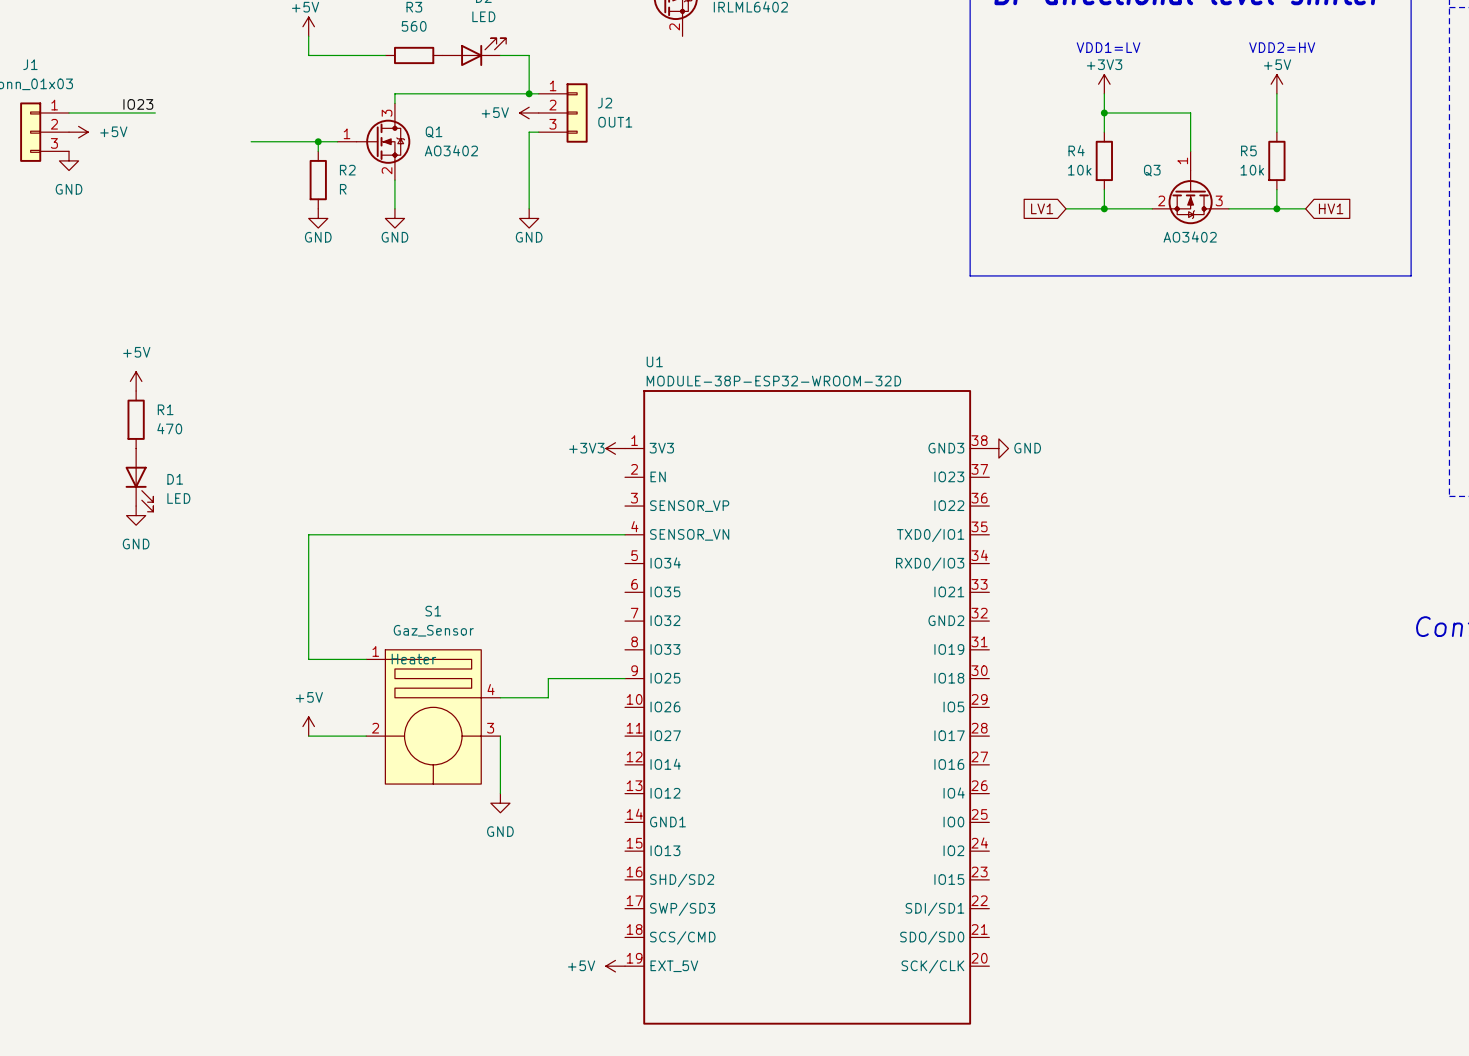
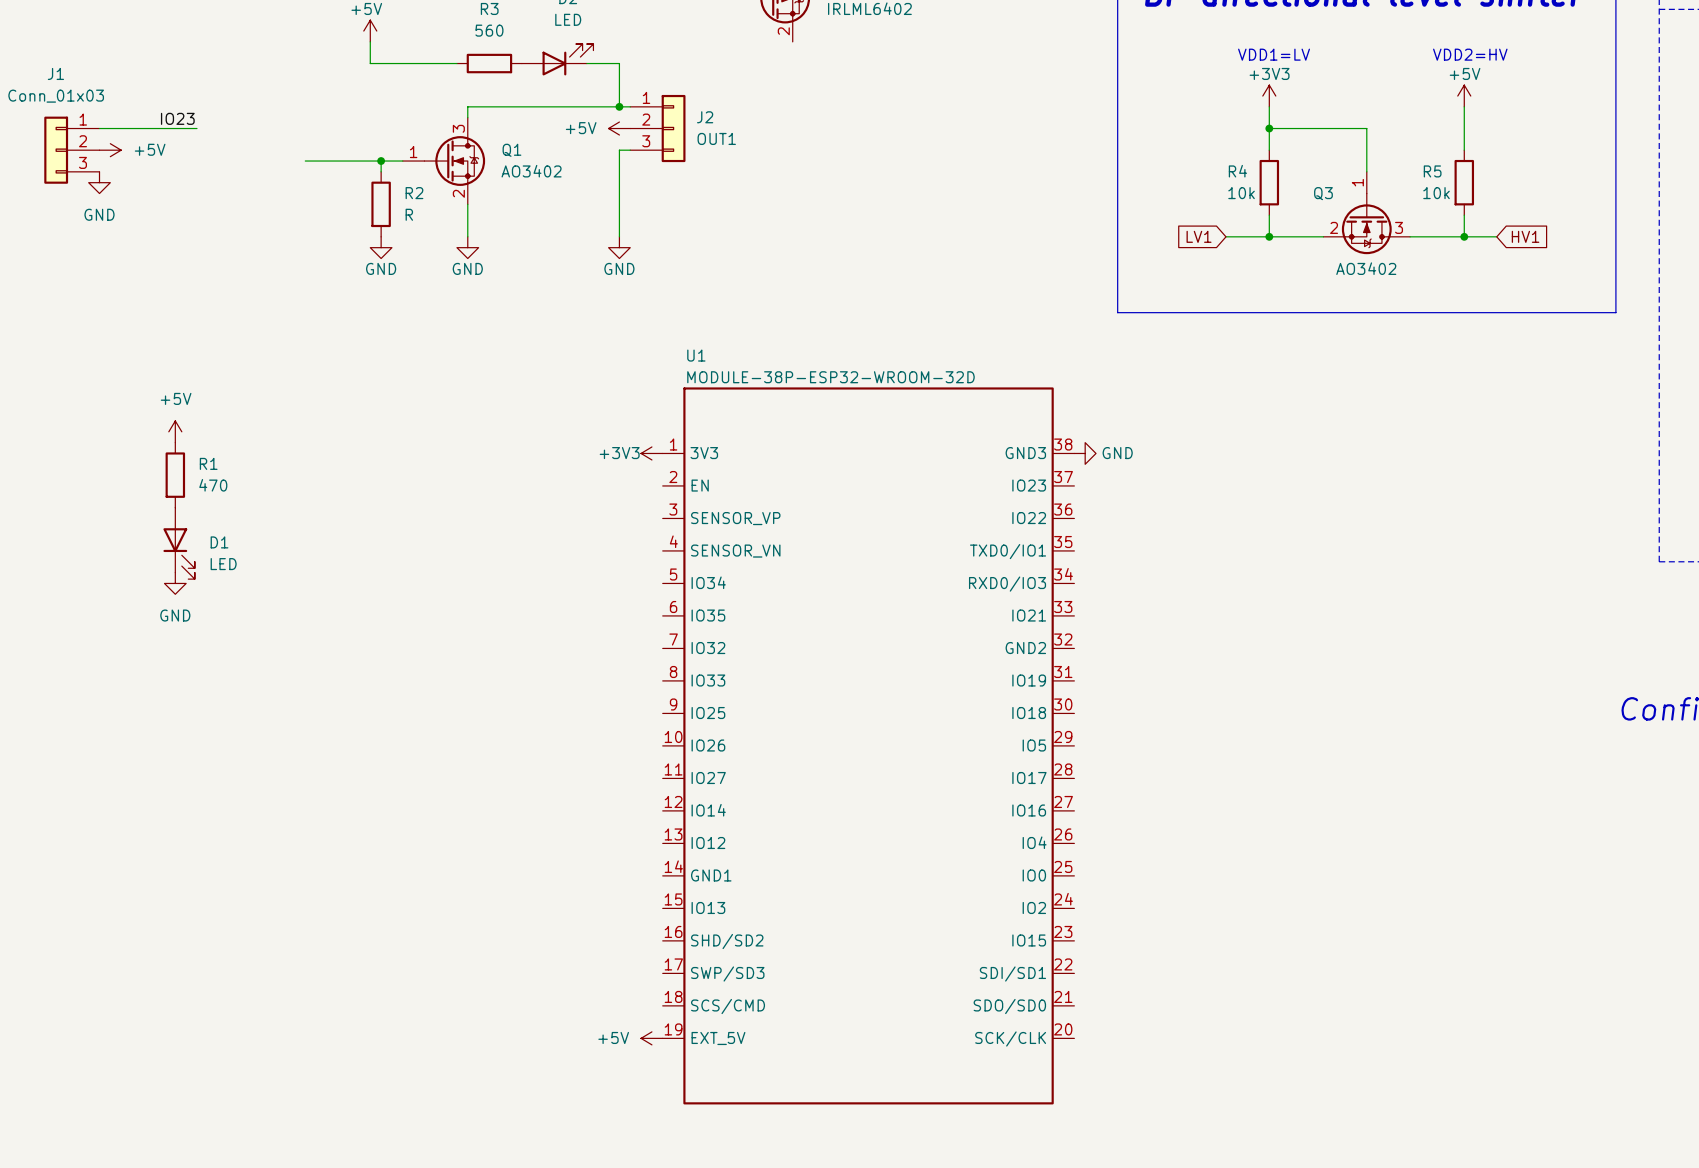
power symbol position: +3V3 (615, 448) -> +3V3 (651, 453)
power symbol position: GND (998, 448) -> GND (1085, 453)
wire: (625, 534) (308, 534) (308, 659) (366, 659) -> none
wire: (625, 678) (548, 678) (548, 697) (500, 697) -> none
U1 position: (807, 707) -> (868, 745)
S1: Gaz_Sensor (433, 716) -> none
power symbol: +5V (308, 726) -> none
wire: (308, 736) (366, 736) -> none
wire: (500, 736) (500, 793) -> none
power symbol: GND (500, 803) -> none
power symbol position: +5V (615, 966) -> +5V (651, 1038)

